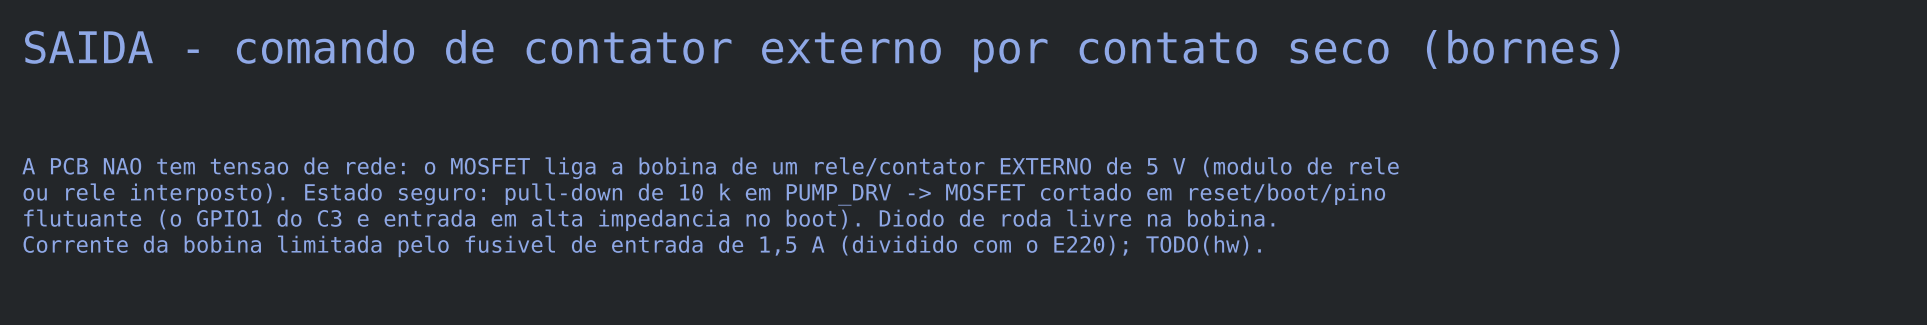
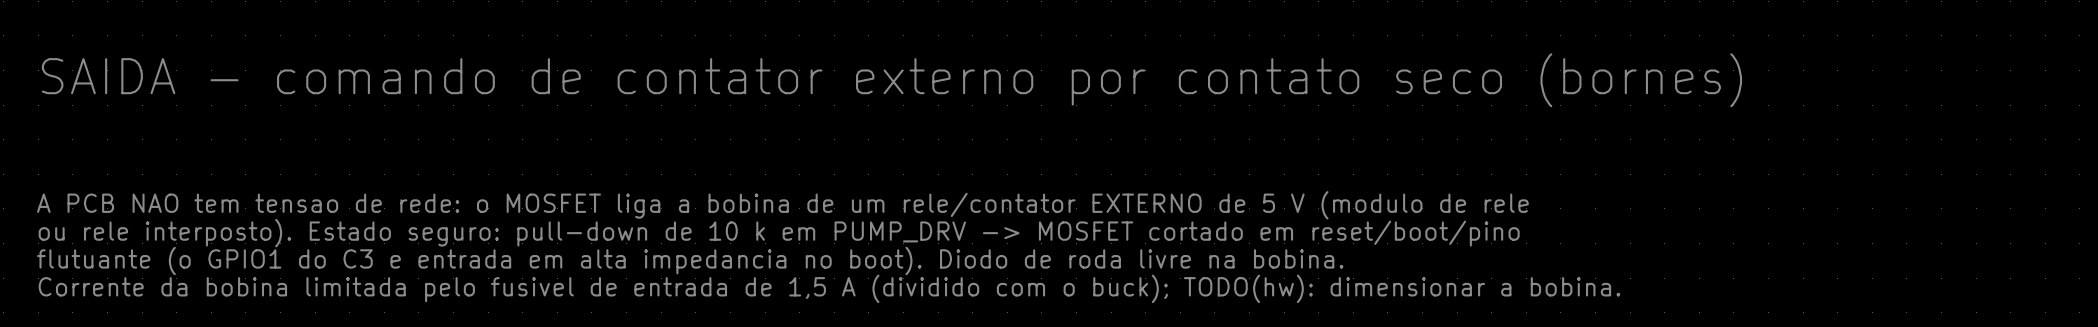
text: Corrente da bobina limitada pelo fusivel de entrada de 1,5 A (dividido com o E220); TODO(hw). (642, 246) -> Corrente da bobina limitada pelo fusivel de entrada de 1,5 A (dividido com o buck); TODO(hw): dimensionar a bobina. (829, 288)

